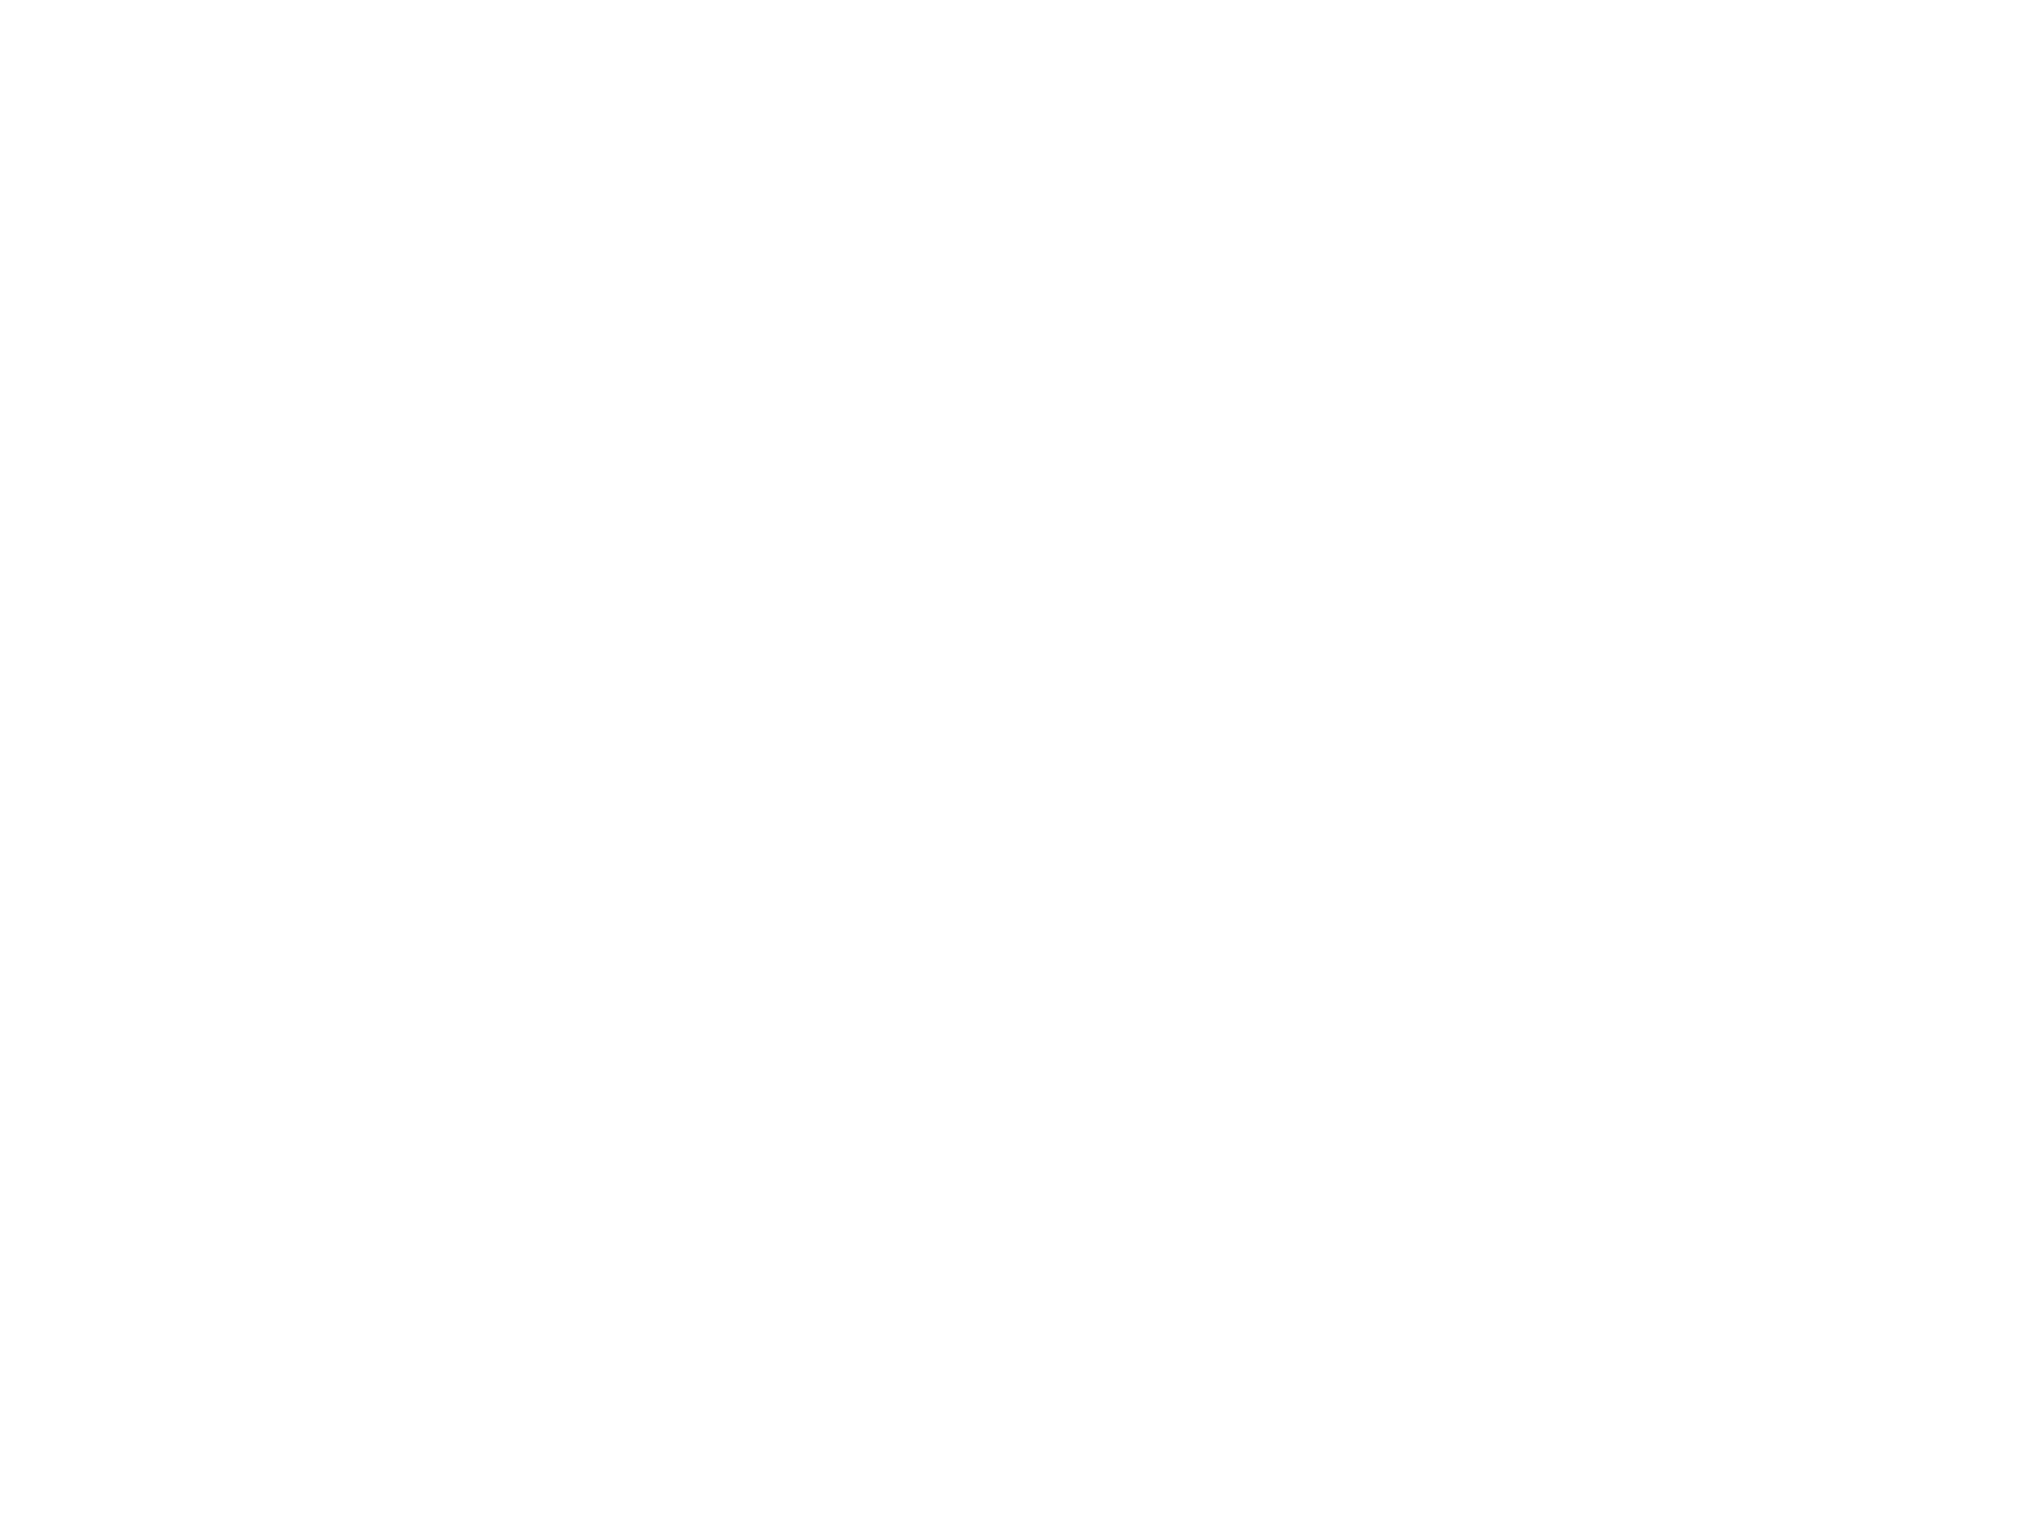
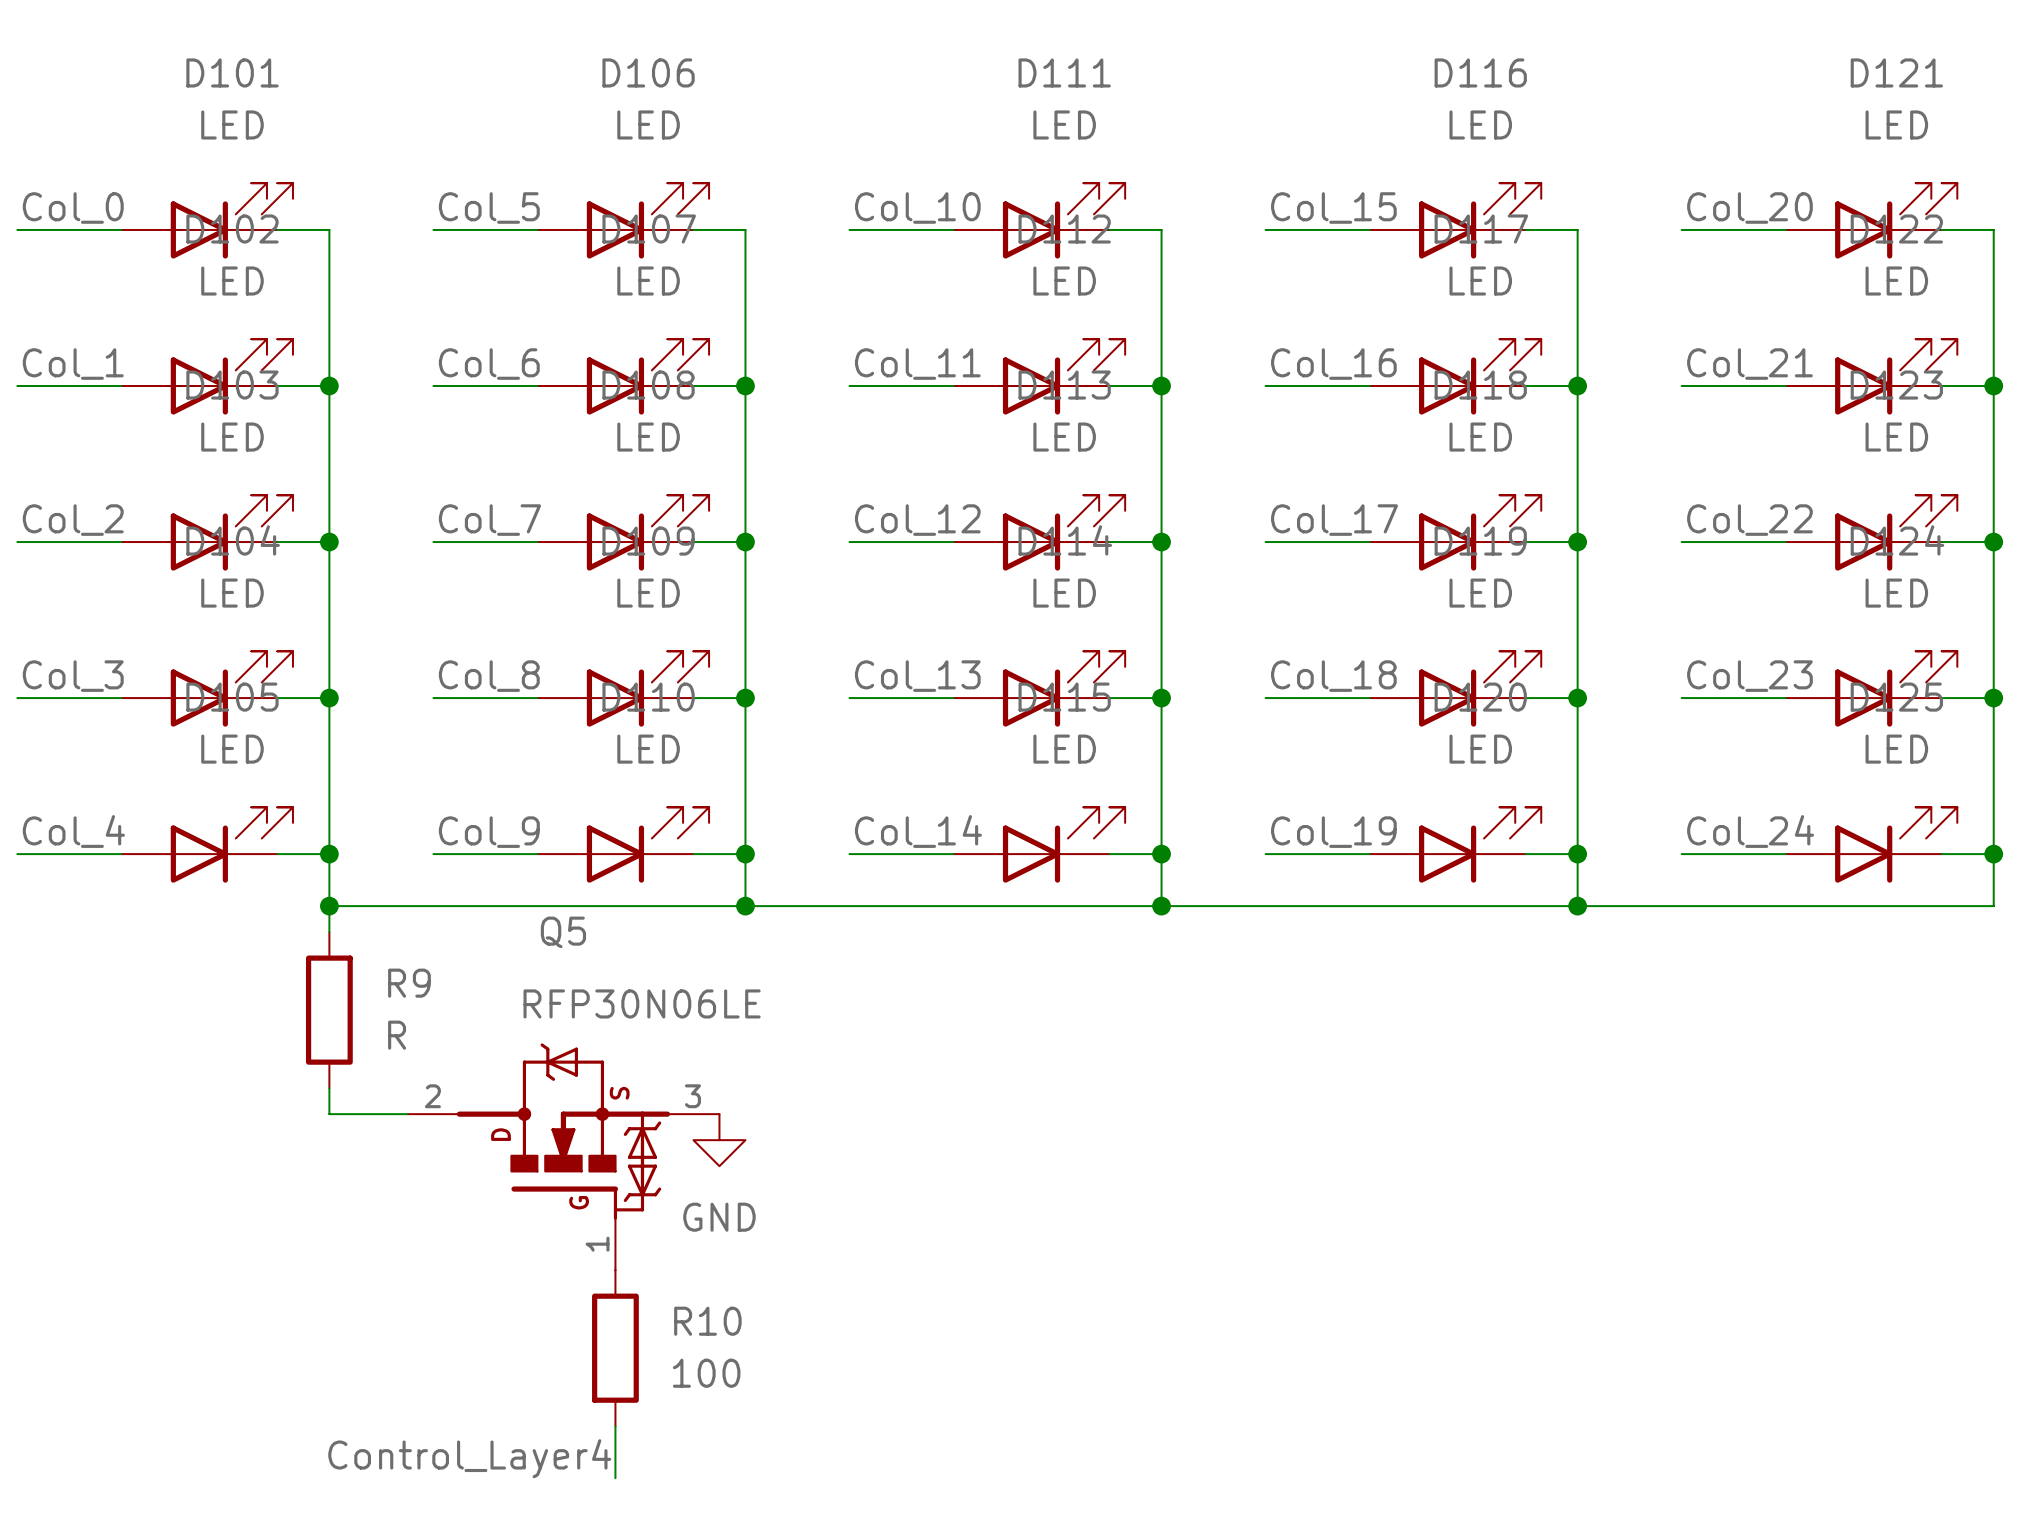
label: none -> Col_0 (73, 208)
label: none -> Col_5 (489, 208)
label: none -> Col_10 (917, 208)
label: none -> Col_15 (1333, 208)
label: none -> Col_20 (1749, 208)
D101: none -> LED (207, 220)
D106: none -> LED (623, 220)
D111: none -> LED (1039, 220)
D116: none -> LED (1455, 220)
D121: none -> LED (1871, 220)
wire: none -> (17, 229) (121, 229)
wire: none -> (277, 229) (329, 229) (329, 932)
wire: none -> (433, 229) (537, 229)
wire: none -> (693, 229) (745, 229) (745, 906)
wire: none -> (849, 229) (953, 229)
wire: none -> (1109, 229) (1161, 229) (1161, 906)
wire: none -> (1265, 229) (1369, 229)
wire: none -> (1525, 229) (1577, 229) (1577, 906)
wire: none -> (1681, 229) (1785, 229)
wire: none -> (1941, 229) (1993, 229) (1993, 906) (329, 906)
label: none -> Col_1 (73, 364)
label: none -> Col_6 (489, 364)
label: none -> Col_11 (917, 364)
label: none -> Col_16 (1333, 364)
label: none -> Col_21 (1749, 364)
D102: none -> LED (207, 376)
D107: none -> LED (623, 376)
D112: none -> LED (1039, 376)
D117: none -> LED (1455, 376)
D122: none -> LED (1871, 376)
wire: none -> (17, 386) (121, 386)
wire: none -> (277, 386) (329, 386)
junction: none -> (329, 386)
wire: none -> (433, 386) (537, 386)
wire: none -> (693, 386) (745, 386)
junction: none -> (745, 386)
wire: none -> (849, 386) (953, 386)
wire: none -> (1109, 386) (1161, 386)
junction: none -> (1161, 386)
wire: none -> (1265, 386) (1369, 386)
wire: none -> (1525, 386) (1577, 386)
junction: none -> (1577, 386)
wire: none -> (1681, 386) (1785, 386)
wire: none -> (1941, 386) (1993, 386)
junction: none -> (1993, 386)
label: none -> Col_2 (73, 520)
label: none -> Col_7 (489, 520)
label: none -> Col_12 (917, 520)
label: none -> Col_17 (1334, 520)
label: none -> Col_22 (1749, 520)
D103: none -> LED (207, 532)
D108: none -> LED (623, 532)
D113: none -> LED (1039, 532)
D118: none -> LED (1455, 532)
D123: none -> LED (1871, 532)
wire: none -> (17, 542) (121, 542)
wire: none -> (277, 542) (329, 542)
junction: none -> (329, 542)
wire: none -> (433, 542) (537, 542)
wire: none -> (693, 542) (745, 542)
junction: none -> (745, 542)
wire: none -> (849, 542) (953, 542)
wire: none -> (1109, 542) (1161, 542)
junction: none -> (1161, 542)
wire: none -> (1265, 542) (1369, 542)
wire: none -> (1525, 542) (1577, 542)
junction: none -> (1577, 542)
wire: none -> (1681, 542) (1785, 542)
wire: none -> (1941, 542) (1993, 542)
junction: none -> (1993, 542)
label: none -> Col_3 (73, 676)
label: none -> Col_8 (489, 676)
label: none -> Col_13 (917, 676)
label: none -> Col_18 (1333, 676)
label: none -> Col_23 (1749, 676)
D104: none -> LED (207, 688)
D109: none -> LED (623, 688)
D114: none -> LED (1039, 688)
D119: none -> LED (1455, 688)
D124: none -> LED (1871, 688)
wire: none -> (17, 698) (121, 698)
wire: none -> (277, 698) (329, 698)
junction: none -> (329, 698)
wire: none -> (433, 698) (537, 698)
wire: none -> (693, 698) (745, 698)
junction: none -> (745, 698)
wire: none -> (849, 698) (953, 698)
wire: none -> (1109, 698) (1161, 698)
junction: none -> (1161, 698)
wire: none -> (1265, 698) (1369, 698)
wire: none -> (1525, 698) (1577, 698)
junction: none -> (1577, 698)
wire: none -> (1681, 698) (1785, 698)
wire: none -> (1941, 698) (1993, 698)
junction: none -> (1993, 698)
label: none -> Col_4 (73, 831)
label: none -> Col_14 (918, 831)
label: none -> Col_24 (1750, 831)
label: none -> Col_9 (489, 832)
label: none -> Col_19 (1333, 832)
D105: none -> LED (207, 844)
D110: none -> LED (623, 844)
D115: none -> LED (1039, 844)
D120: none -> LED (1455, 844)
D125: none -> LED (1871, 844)
wire: none -> (17, 854) (121, 854)
wire: none -> (277, 854) (329, 854)
junction: none -> (329, 854)
wire: none -> (433, 854) (537, 854)
wire: none -> (693, 854) (745, 854)
junction: none -> (745, 854)
wire: none -> (849, 854) (953, 854)
wire: none -> (1109, 854) (1161, 854)
junction: none -> (1161, 854)
wire: none -> (1265, 854) (1369, 854)
wire: none -> (1525, 854) (1577, 854)
junction: none -> (1577, 854)
wire: none -> (1681, 854) (1785, 854)
wire: none -> (1941, 854) (1993, 854)
junction: none -> (1993, 854)
junction: none -> (329, 906)
junction: none -> (745, 906)
junction: none -> (1161, 906)
junction: none -> (1577, 906)
R9: none -> R (329, 1010)
wire: none -> (329, 1088) (329, 1114) (407, 1114)
power symbol: none -> GND (719, 1140)
Q5: none -> RFP30N06LE (563, 1156)
R10: none -> 100 (615, 1348)
wire: none -> (615, 1426) (615, 1478)
label: none -> Control_Layer4 (469, 1458)

